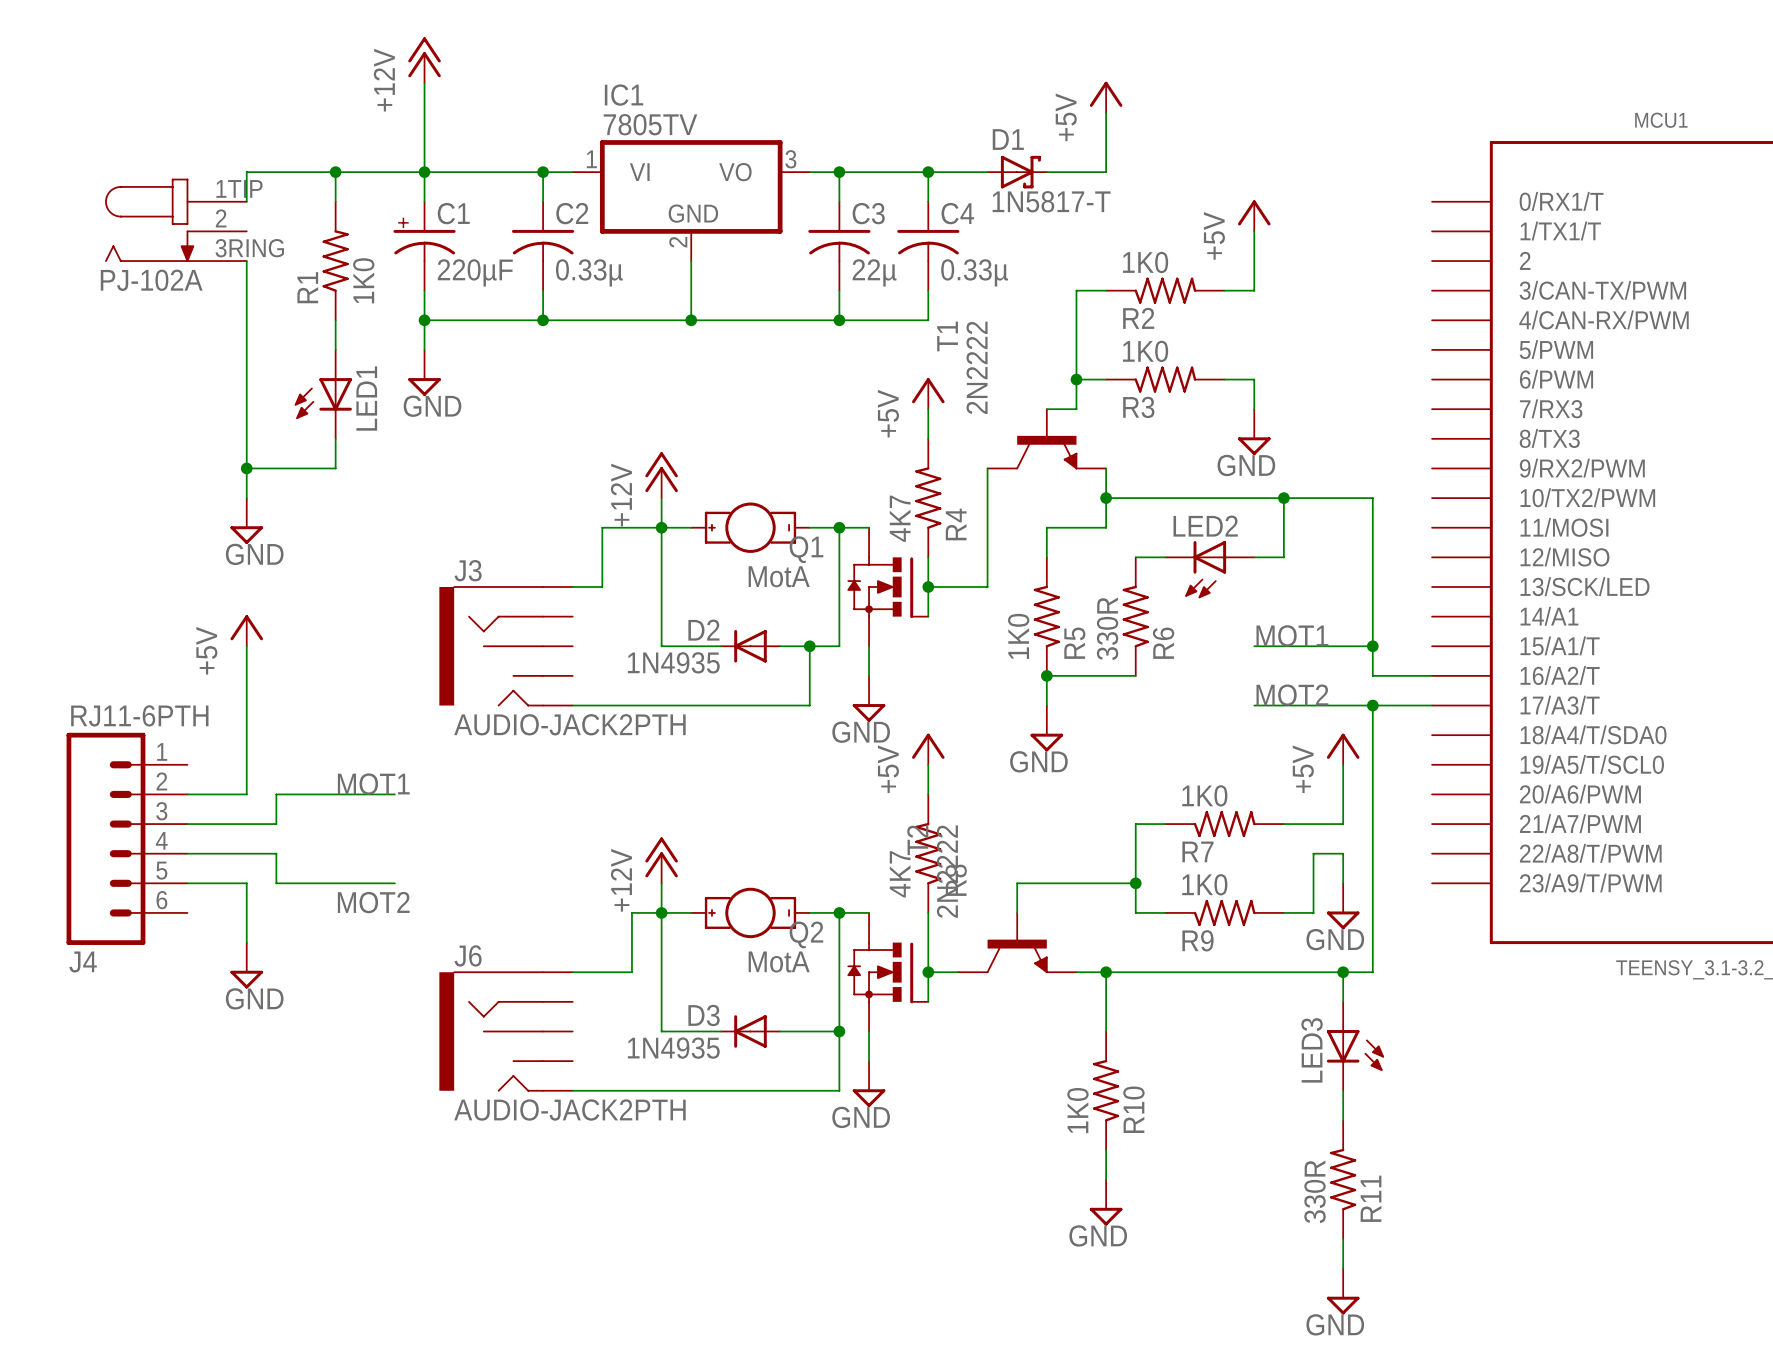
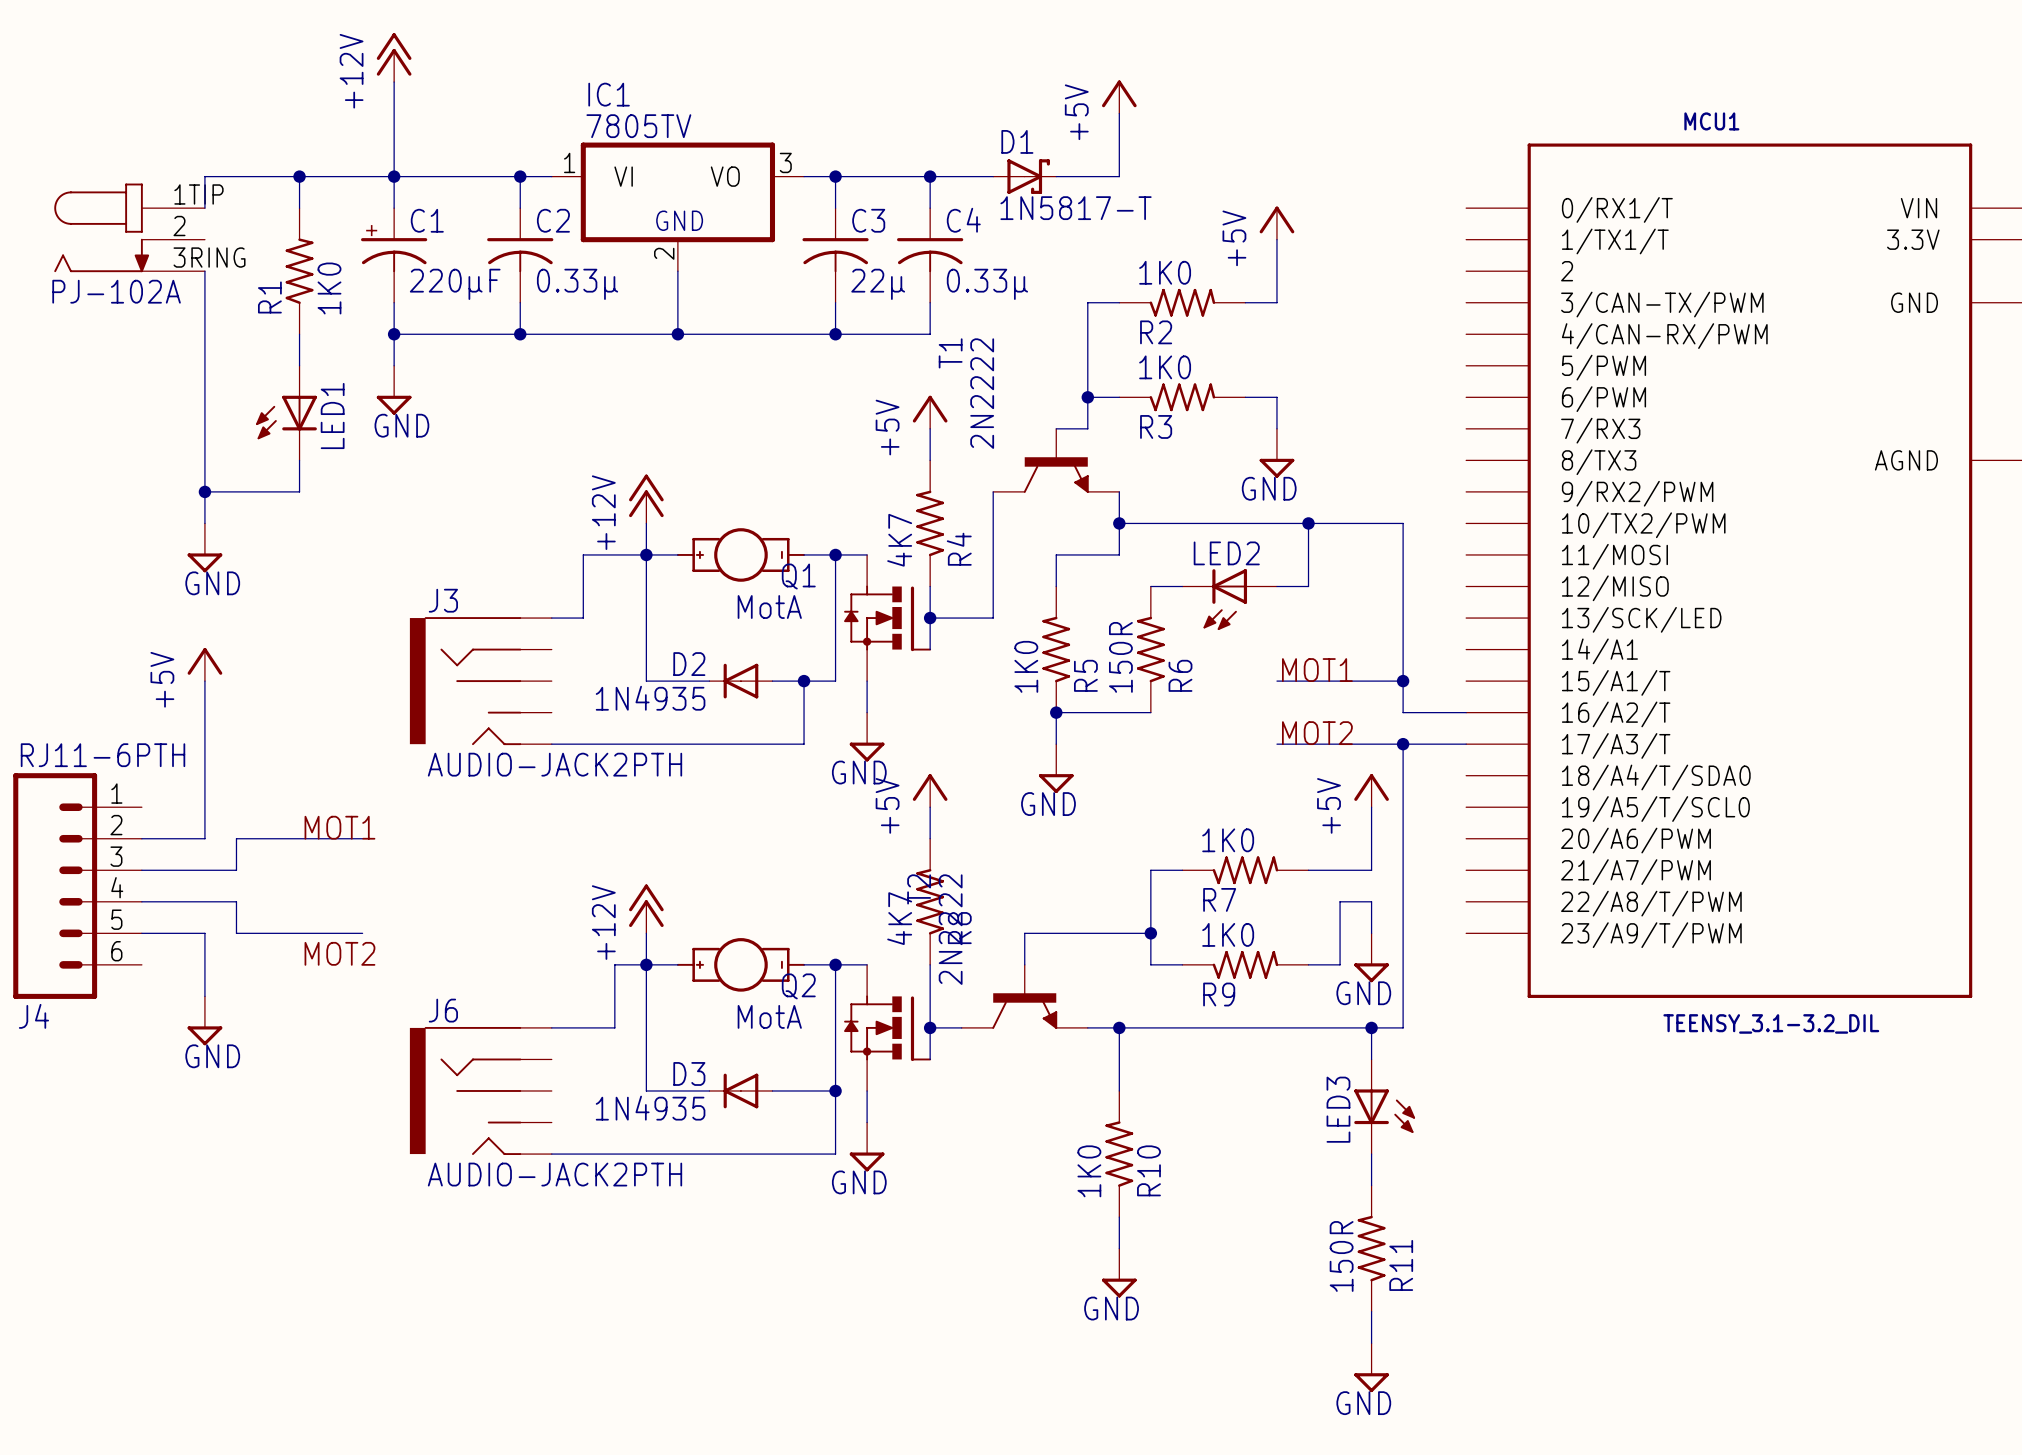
R6 value: 330R (1107, 628) -> 150R (1120, 657)
R11 value: 330R (1315, 1191) -> 150R (1341, 1256)

